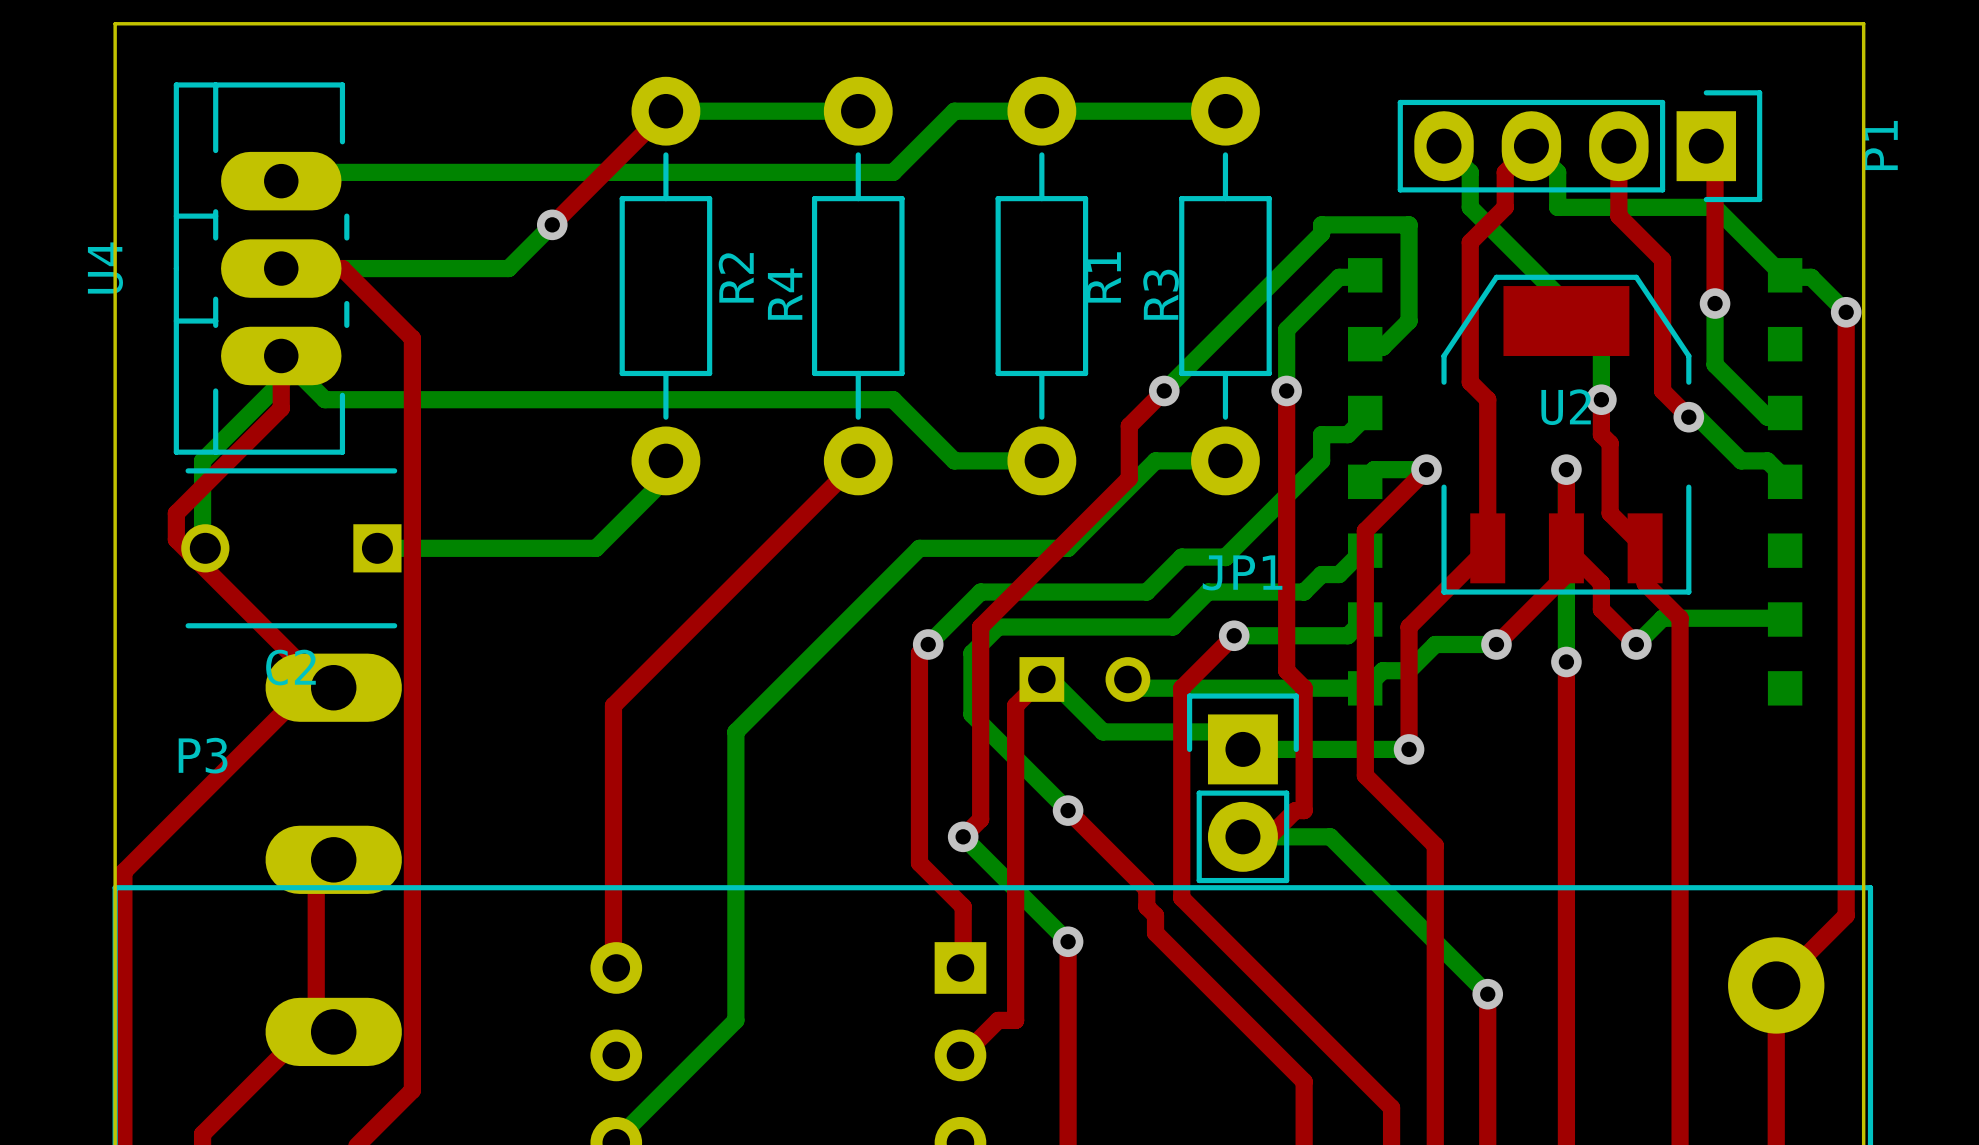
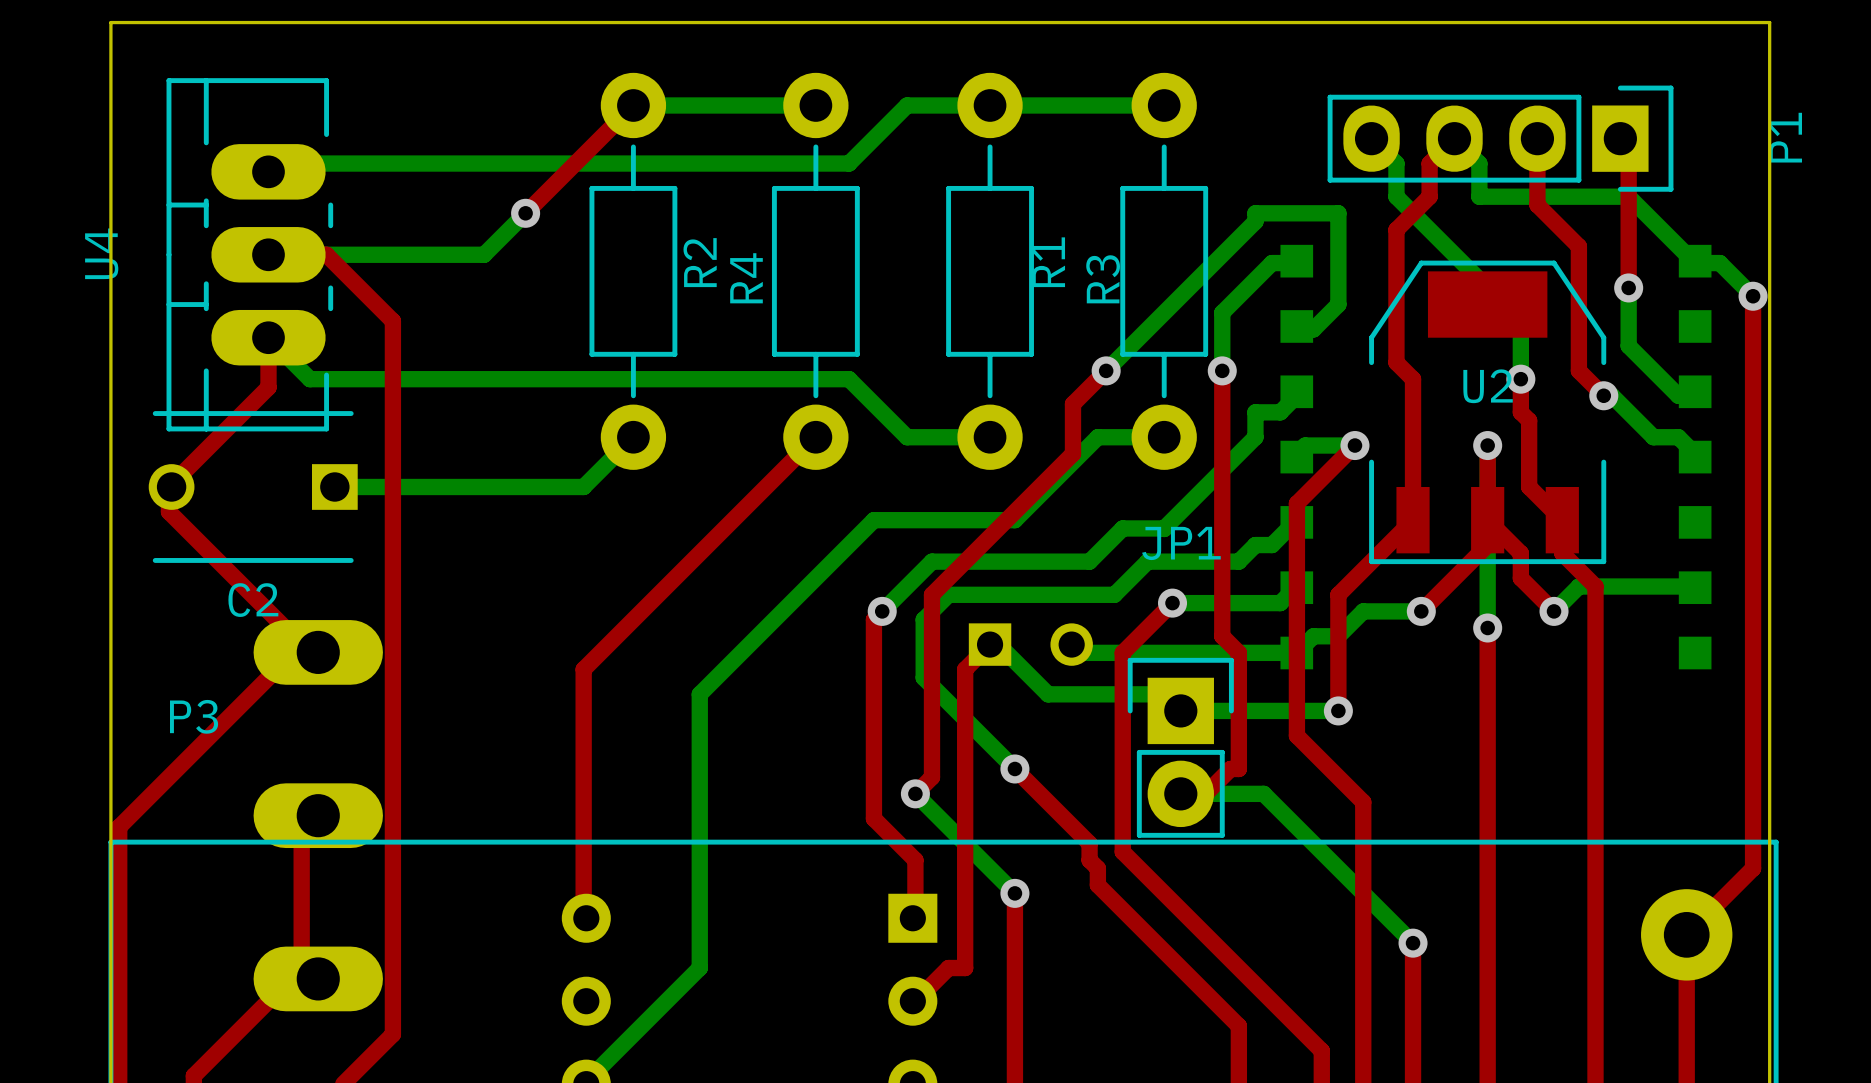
bottom track: (281, 355) (290, 373) (202, 460) (202, 548) (205, 548) -> none
bottom track: (665, 460) (683, 460) (595, 548) (377, 548) -> (633, 437) (583, 487) (334, 487)
C2 position: (291, 548) -> (253, 487)

